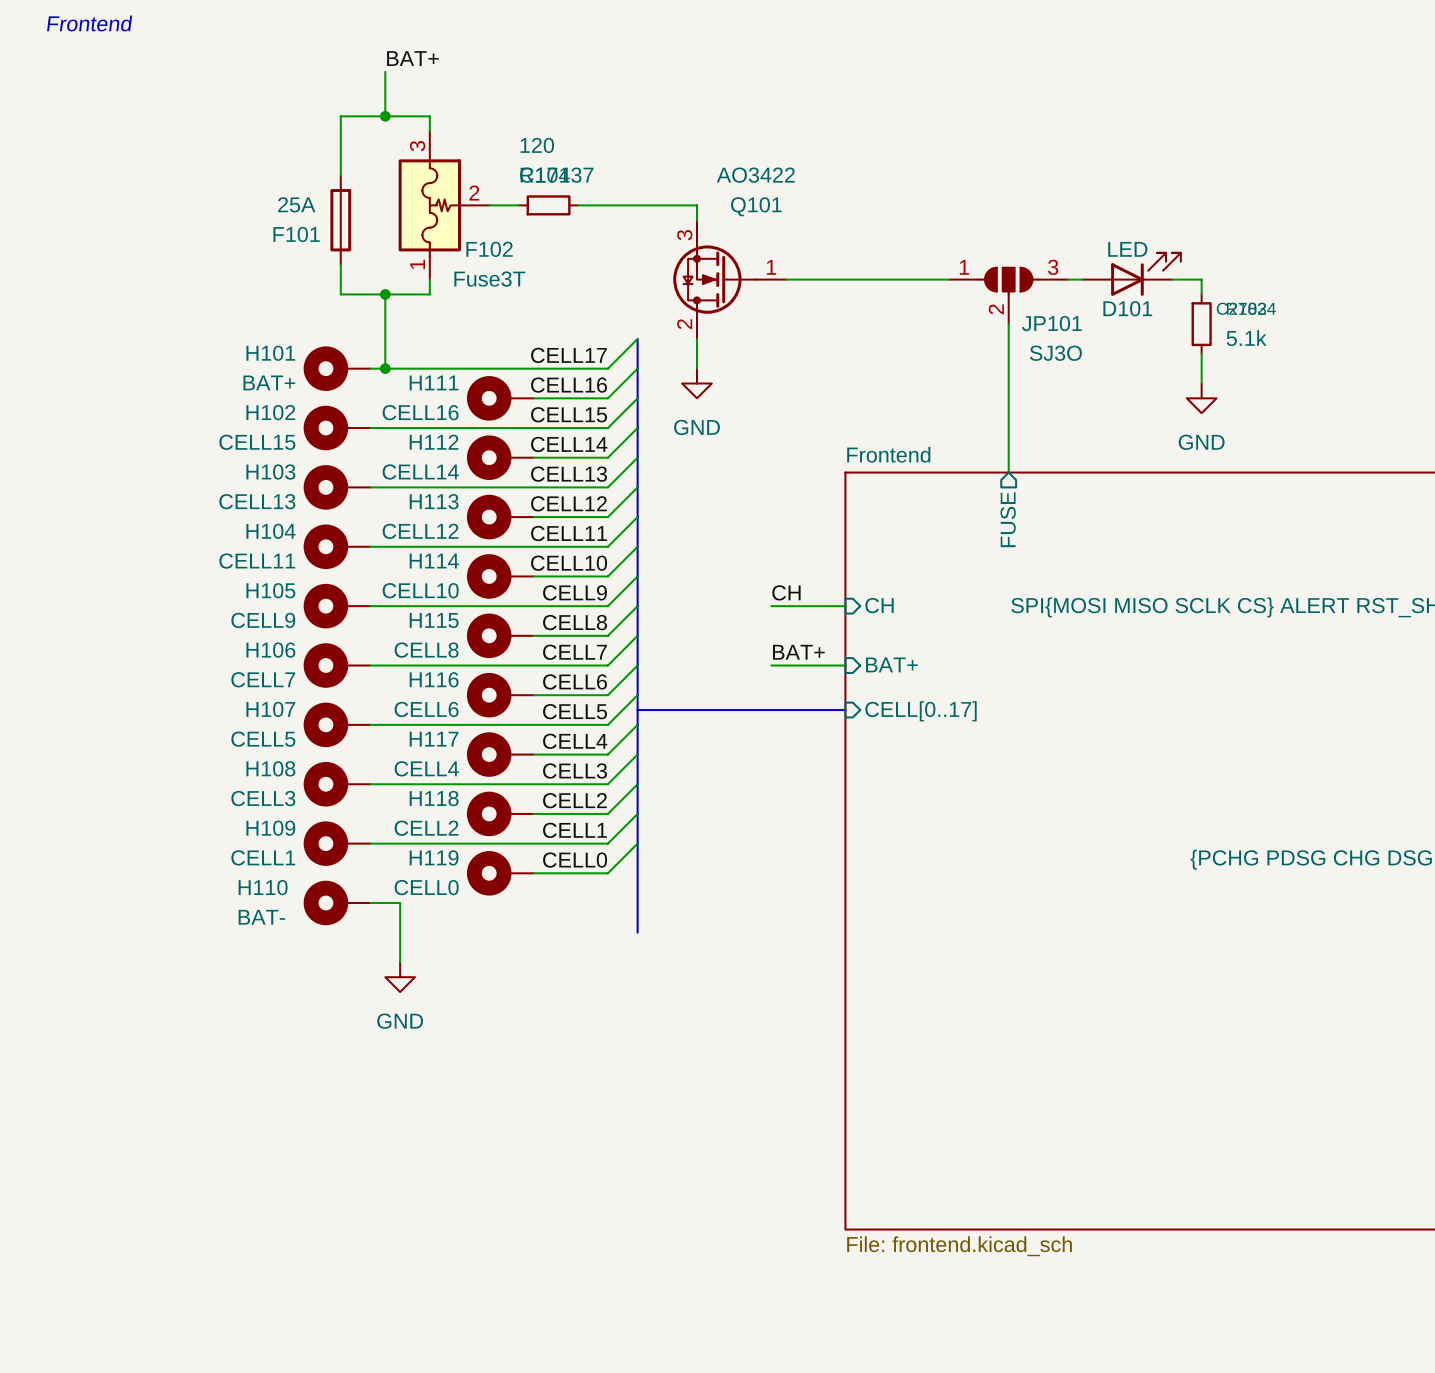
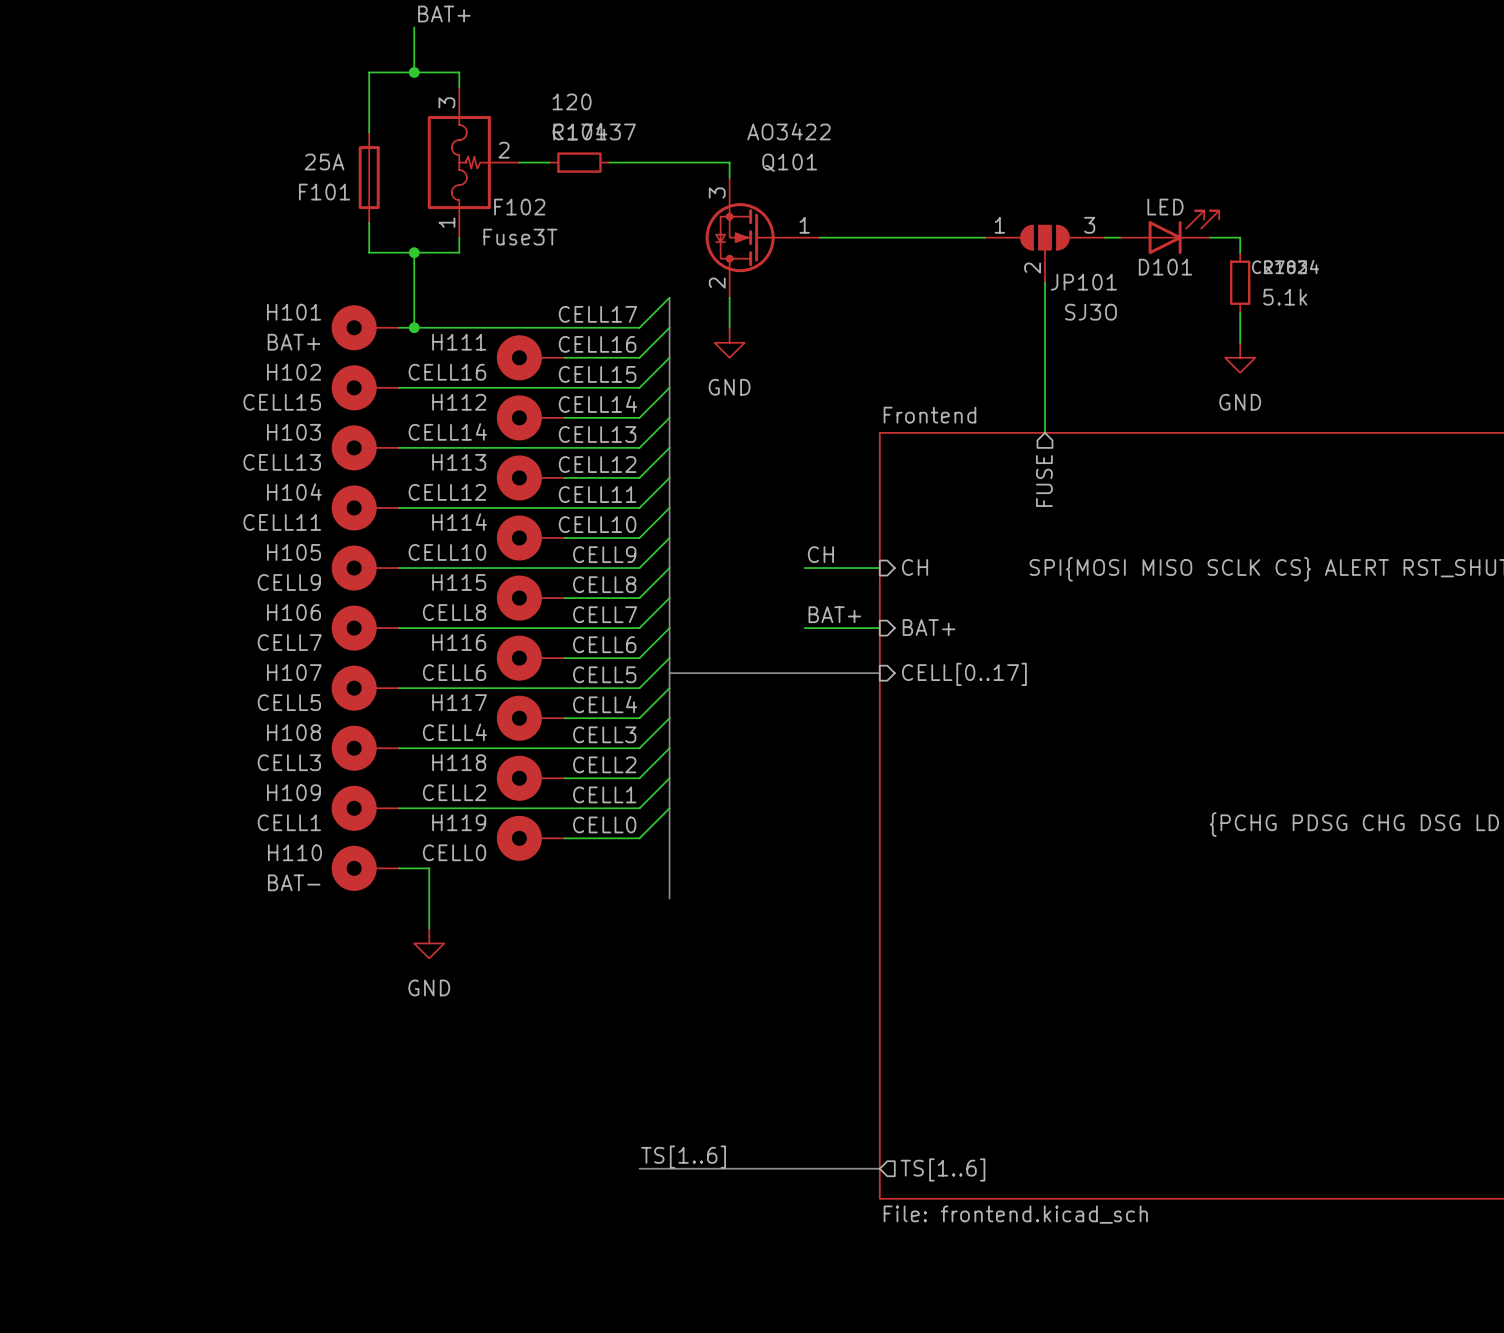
label: none -> TS[1..6] (683, 1157)
bus: none -> (639, 1168) (879, 1168)
sheet pin: none -> TS[1..6] (942, 1169)

